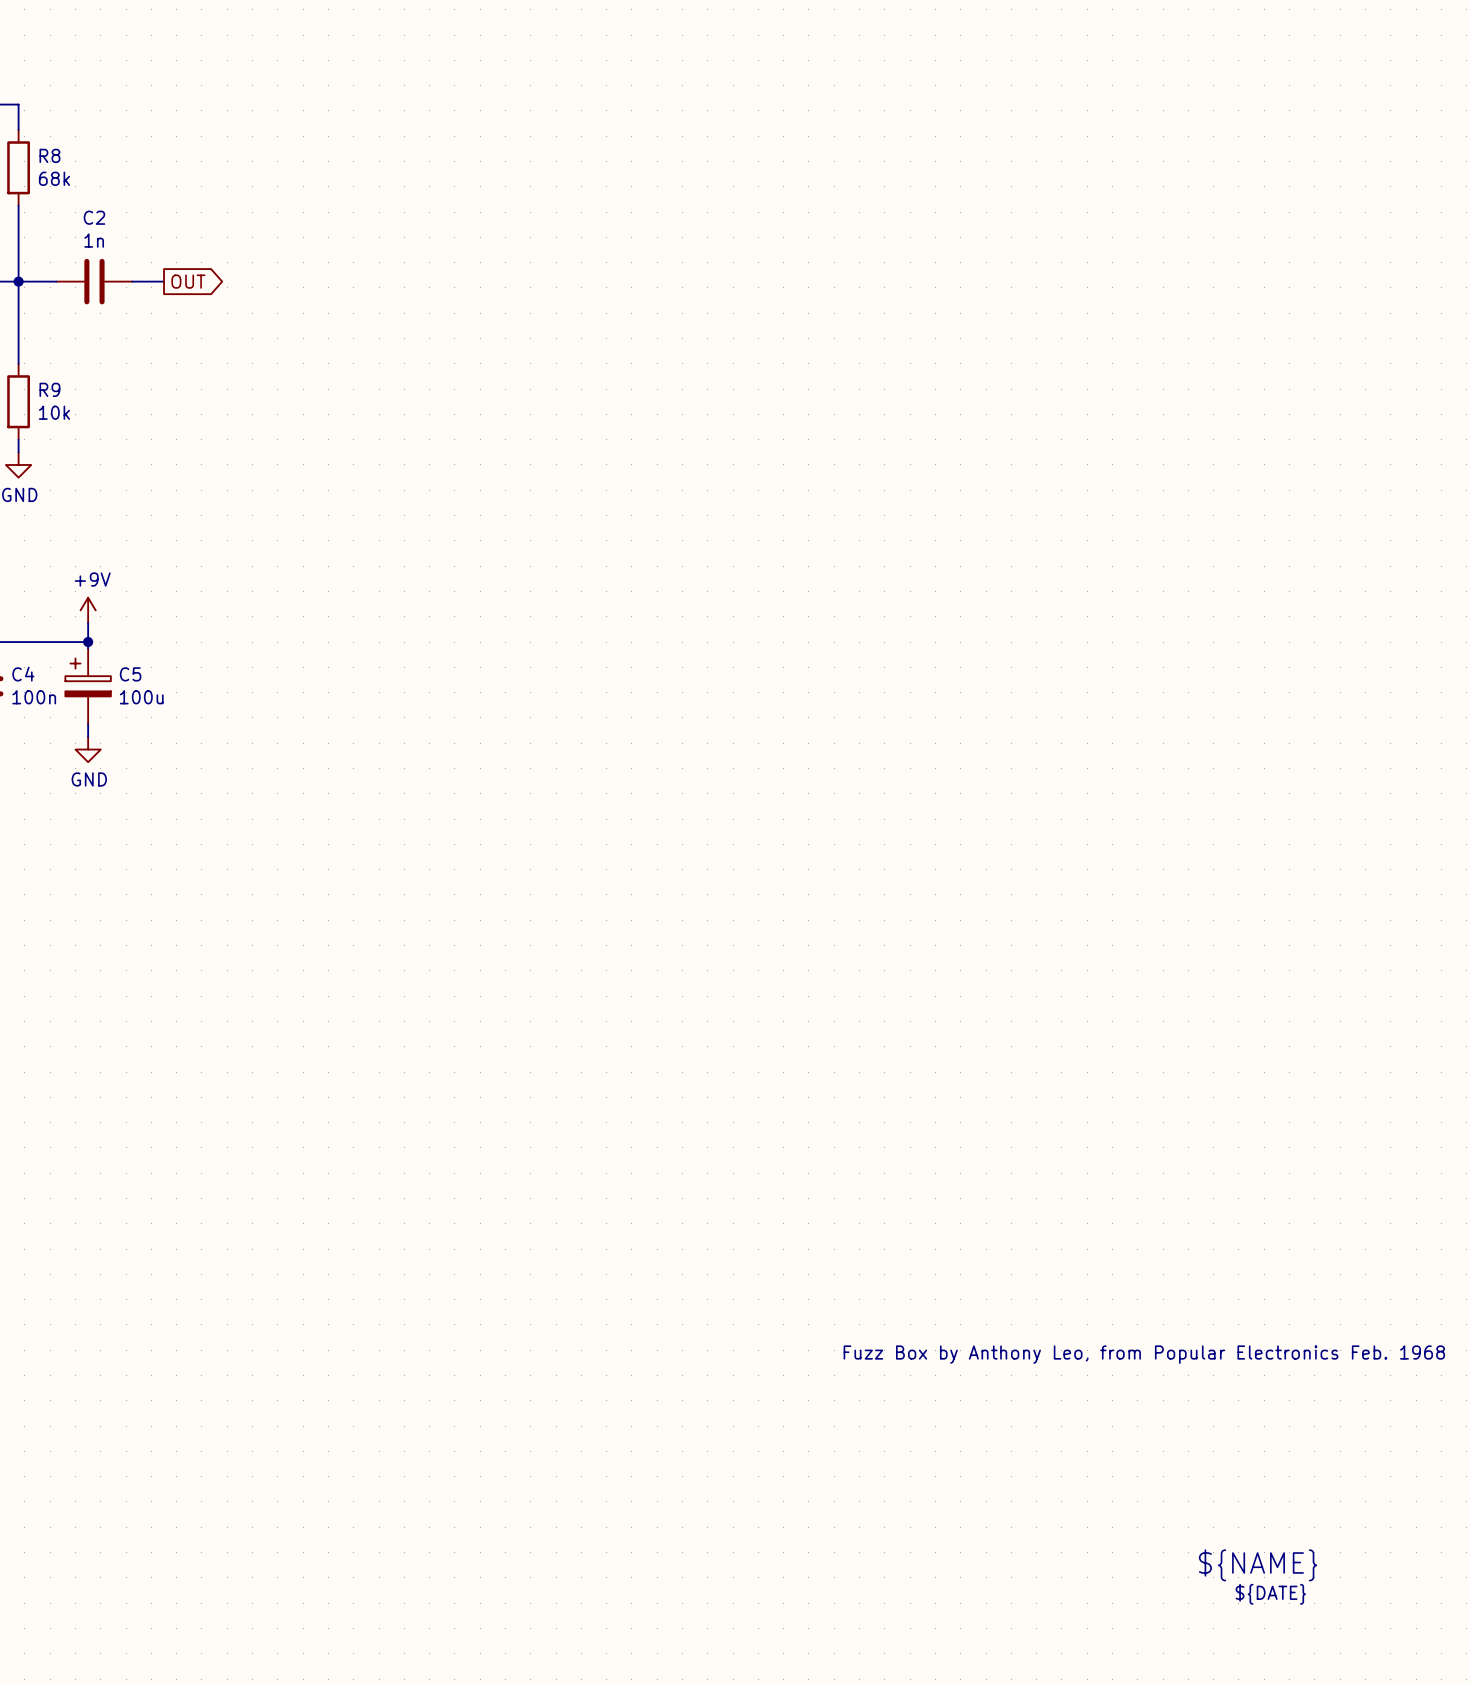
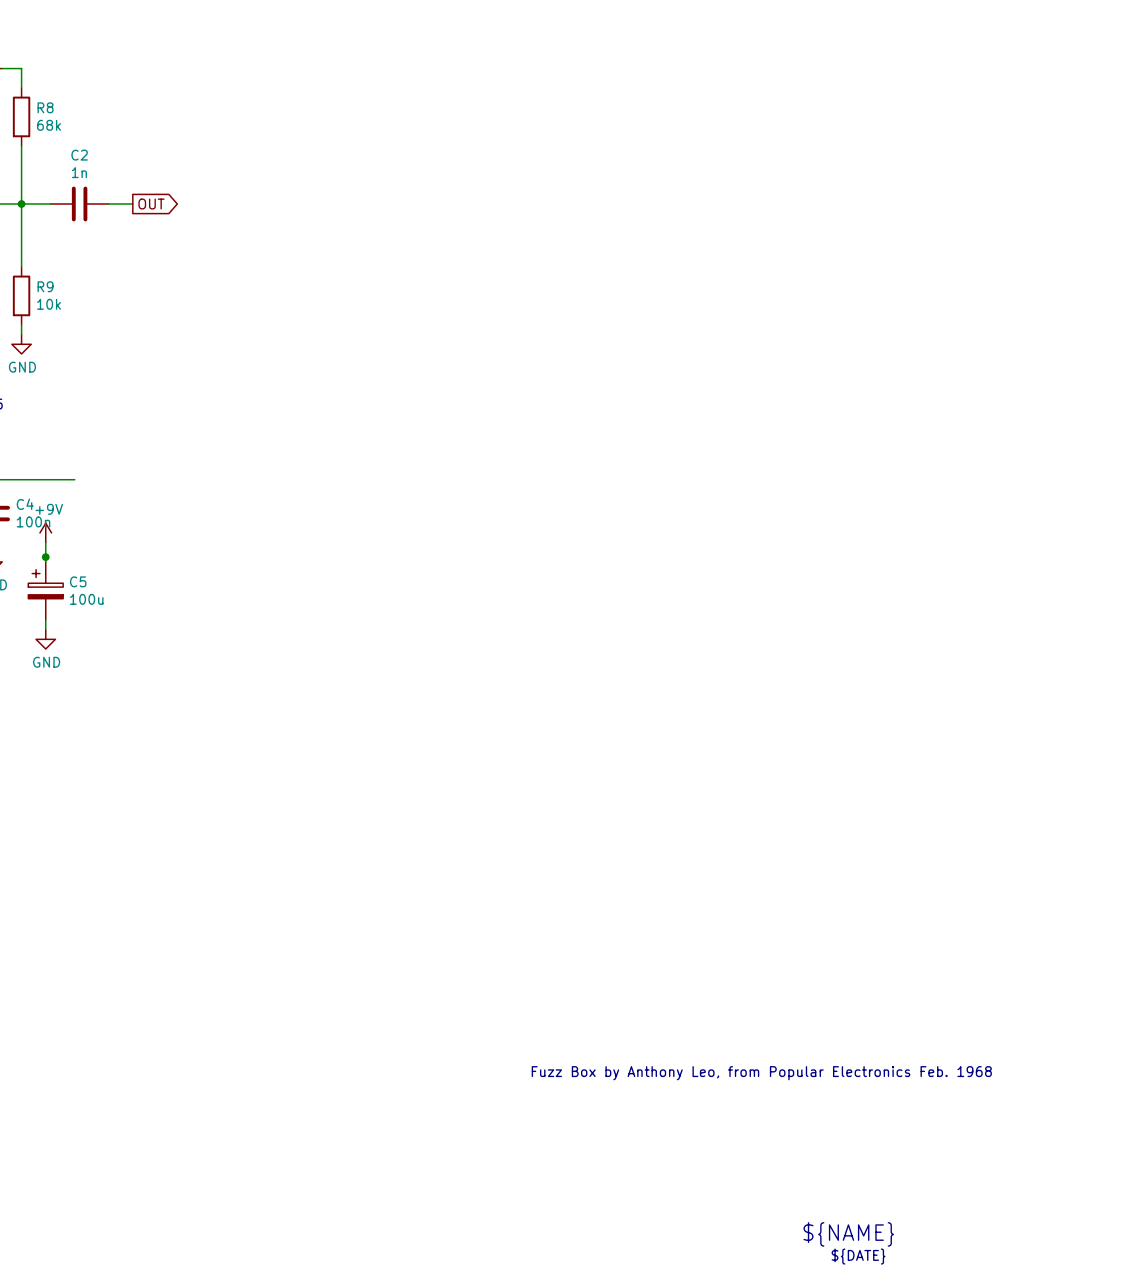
power symbol position: +9V (88, 610) -> +9V (45, 532)
wire: (88, 623) (88, 648) -> (45, 542) (45, 561)
junction: (88, 642) -> none
C5 position: (88, 686) -> (45, 590)
wire: (88, 724) (88, 736) -> (45, 619) (45, 629)
junction: none -> (45, 557)
power symbol: GND (88, 749) -> none
power symbol: none -> GND (45, 639)
text position: Fuzz Box by Anthony Leo, from Popular Electronics Feb. 1968 (1144, 1354) -> Fuzz Box by Anthony Leo, from Popular Electronics Feb. 1968 (761, 1073)
text position: ${NAME} (1258, 1565) -> ${NAME} (848, 1234)
text position: ${DATE} (1270, 1594) -> ${DATE} (858, 1256)

